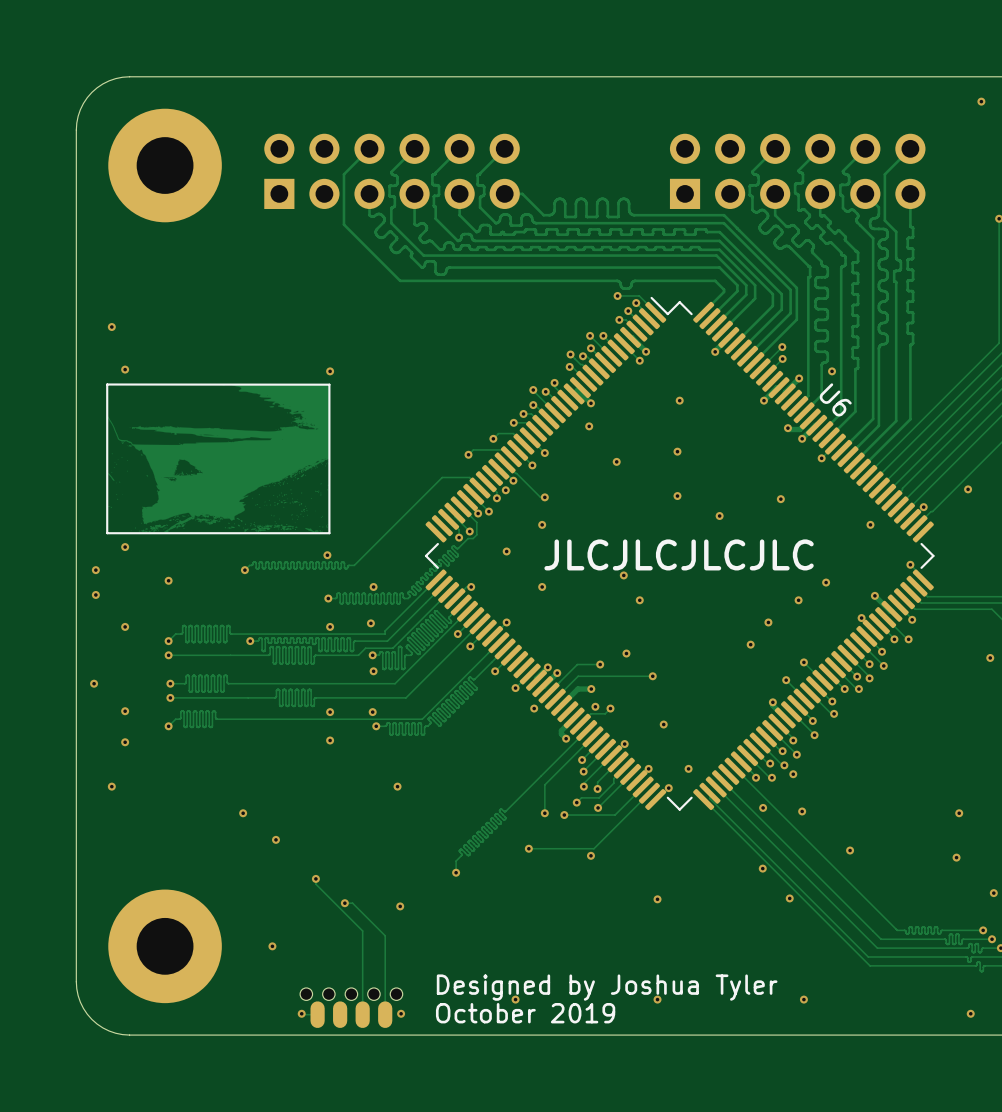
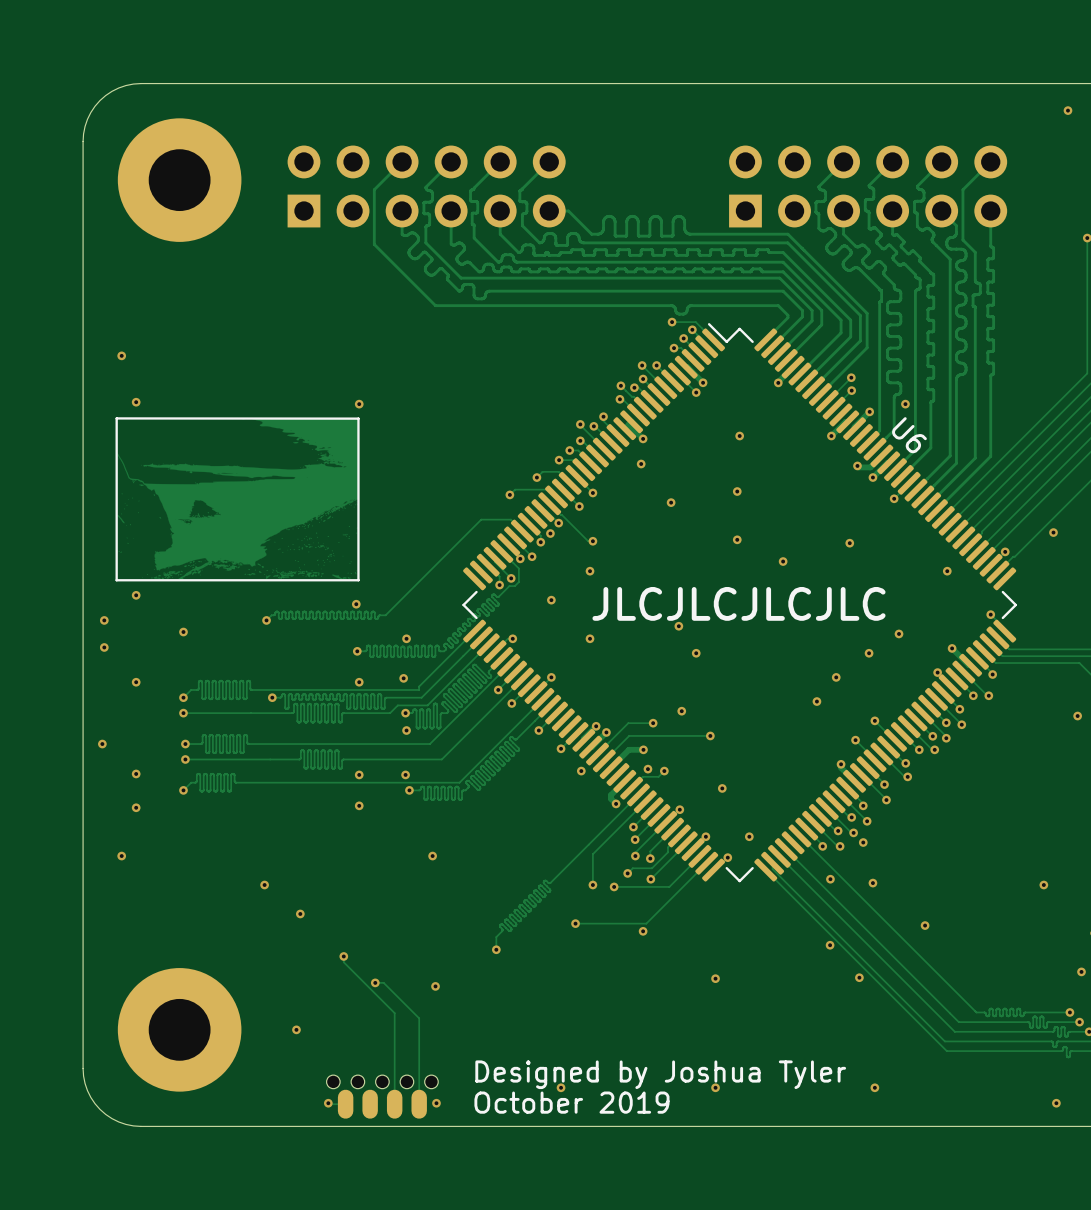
via: (956, 857) -> none

